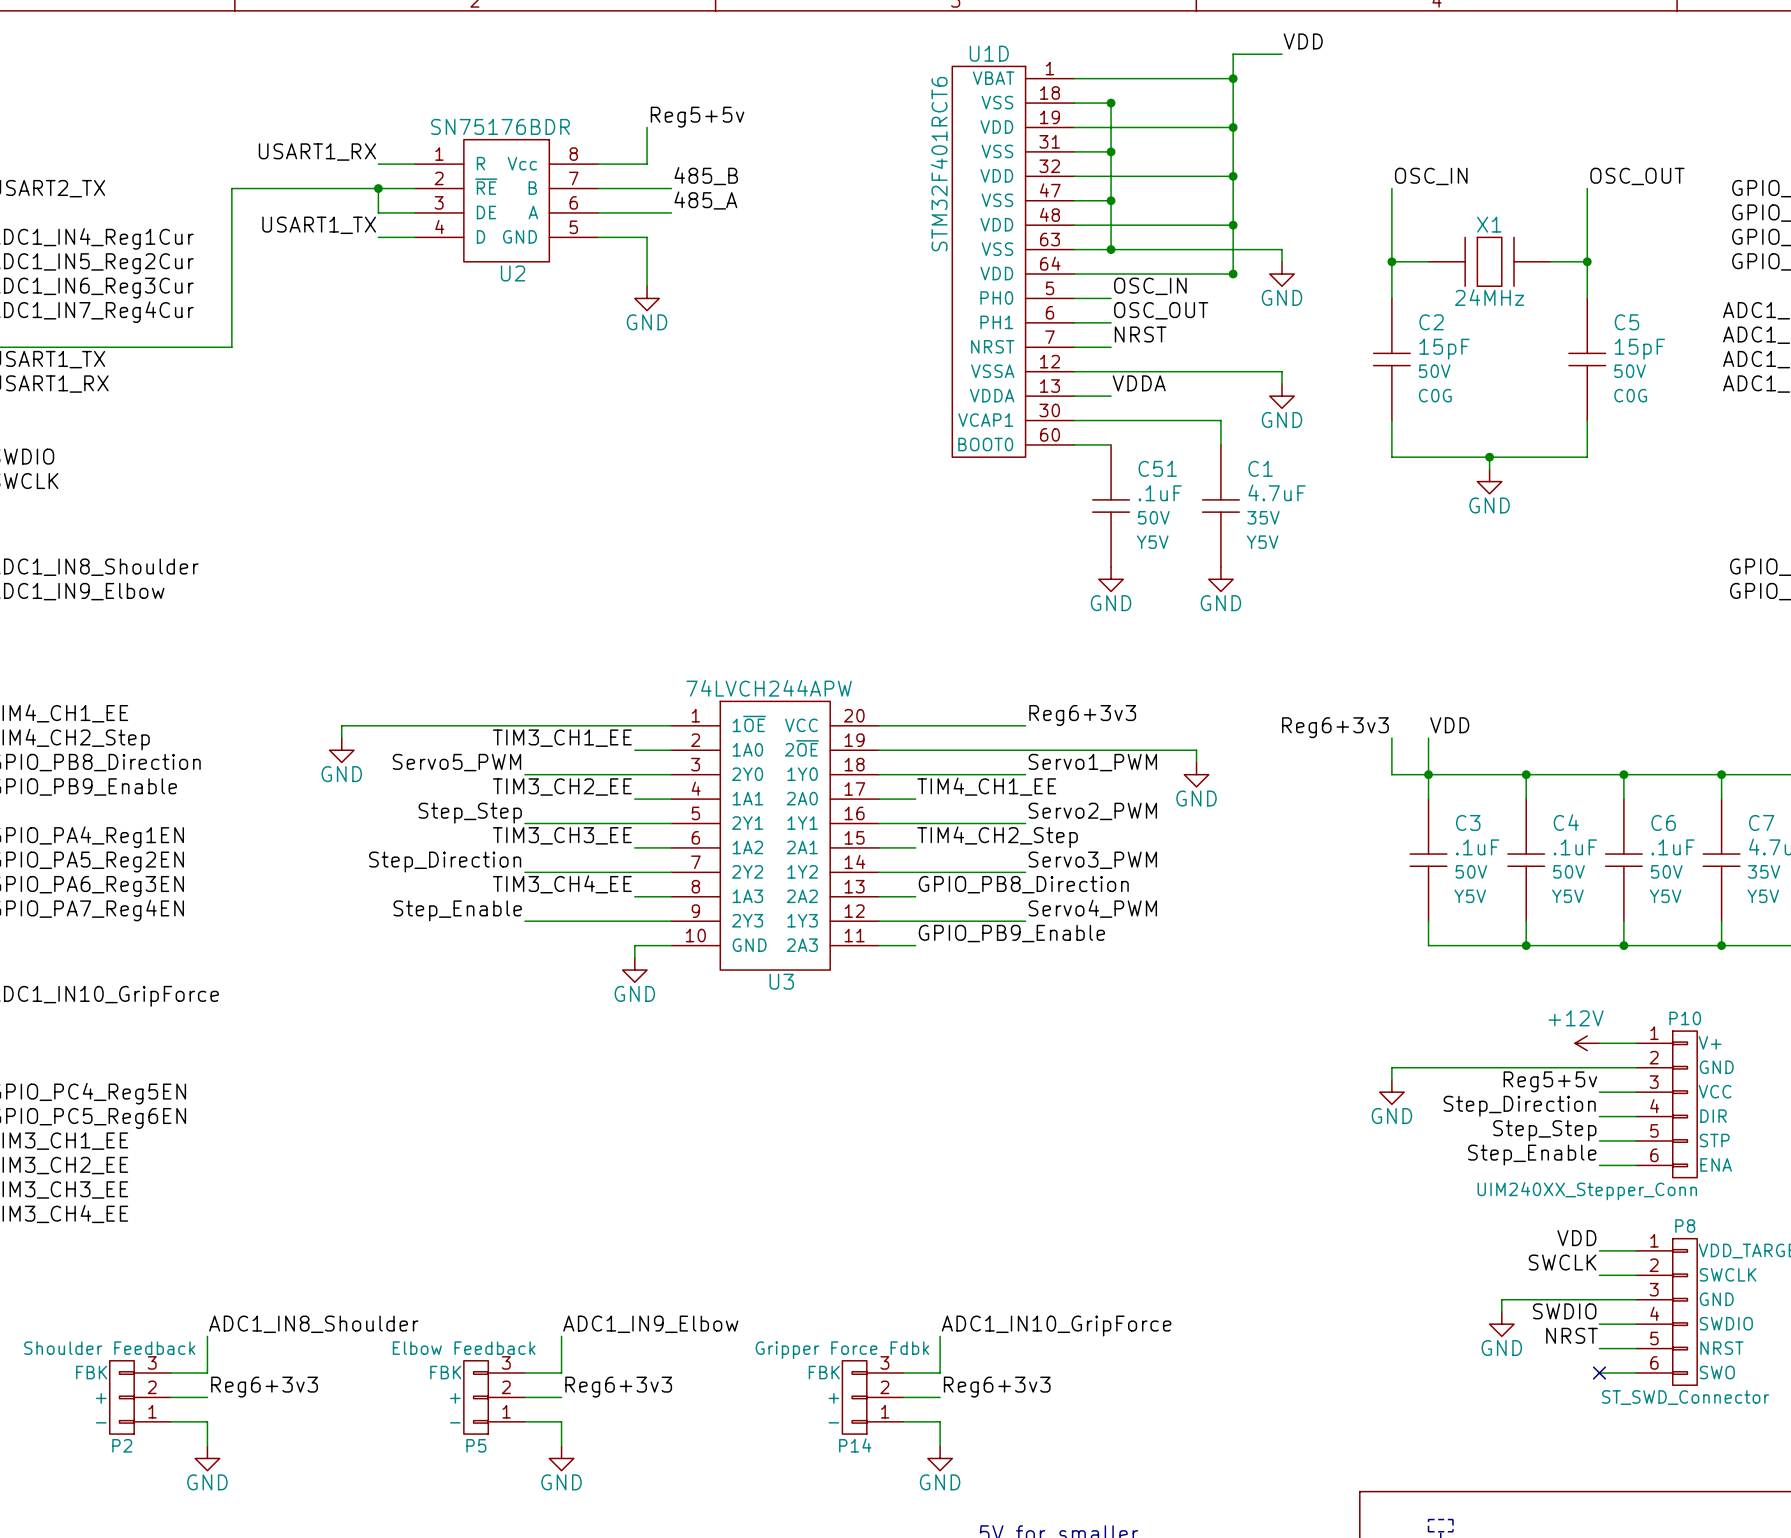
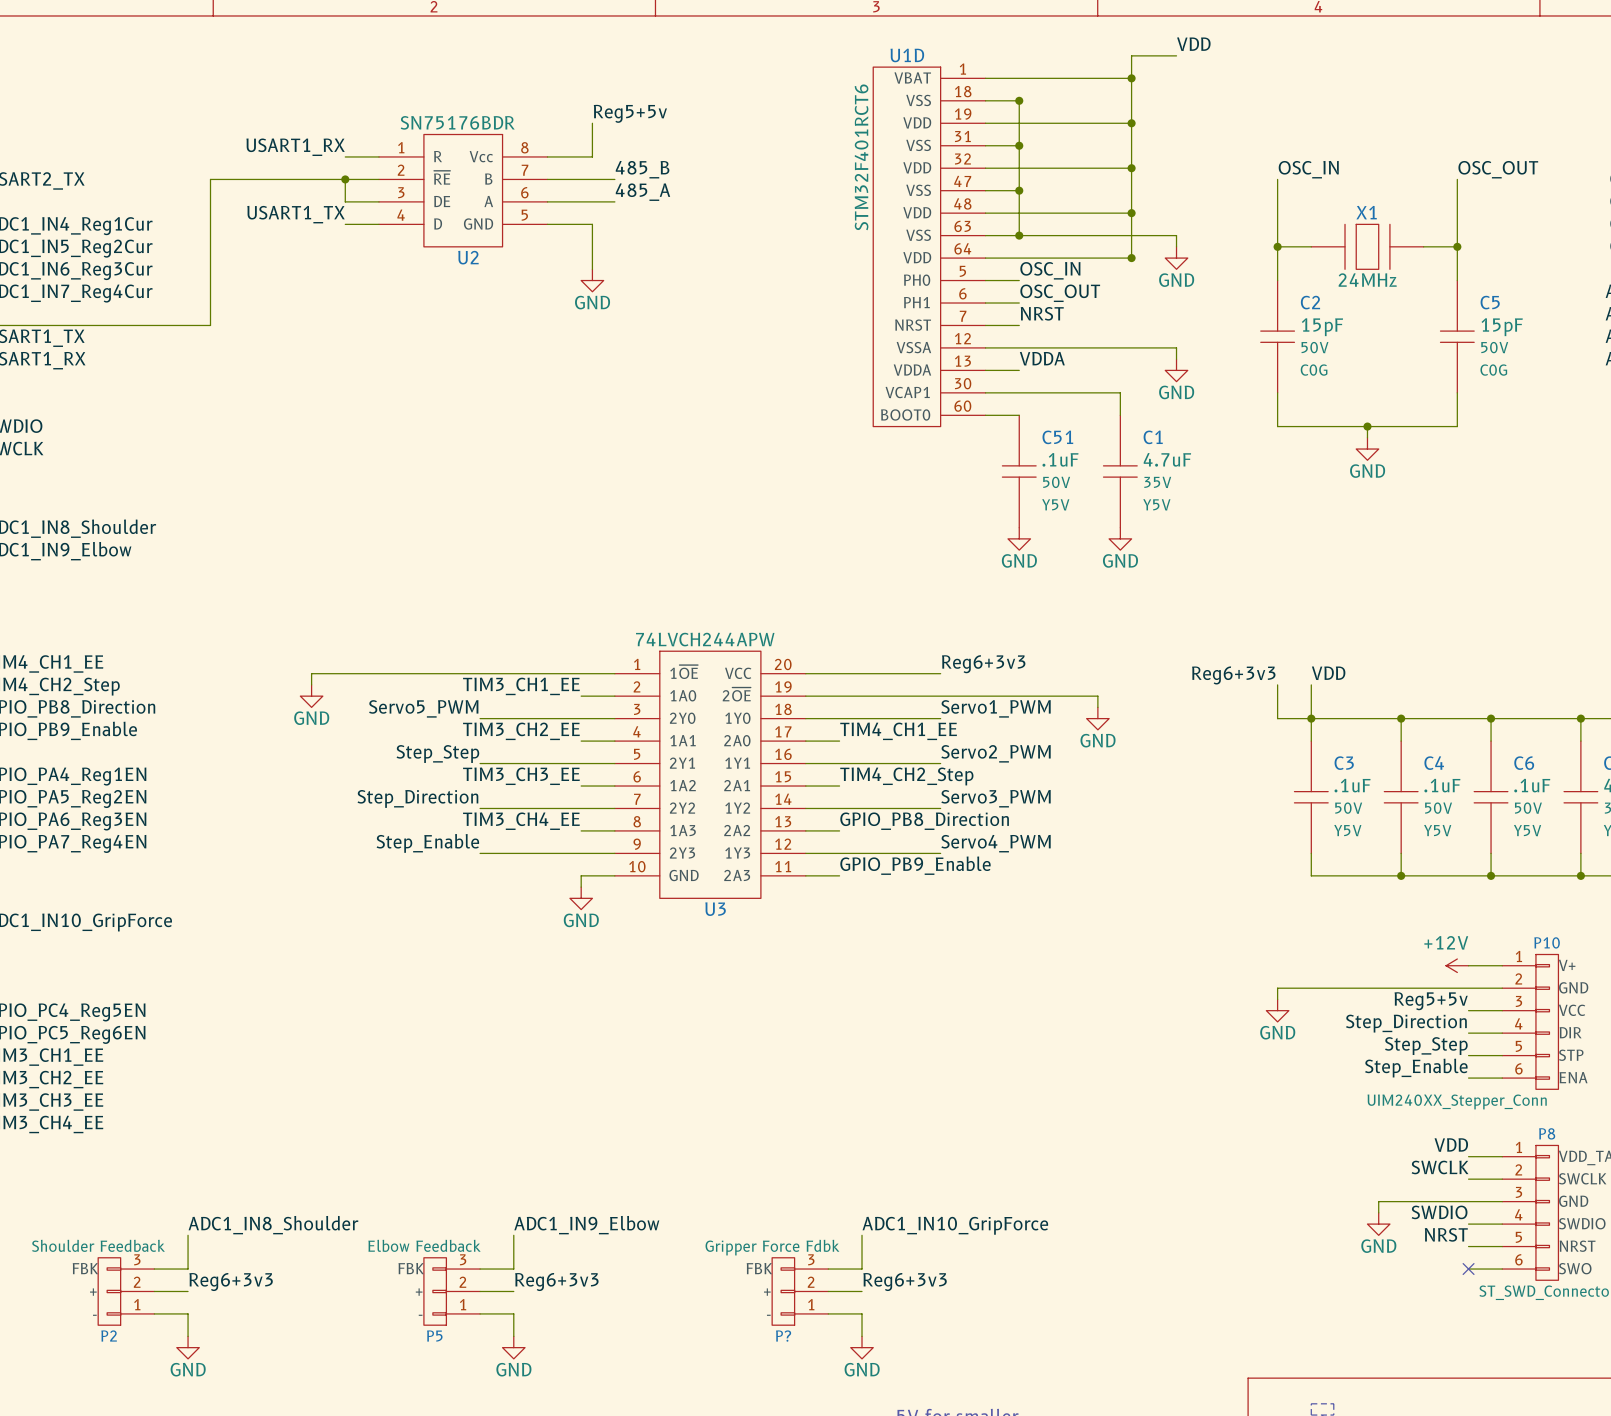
P14 name: P14 (855, 1445) -> P? (783, 1336)

